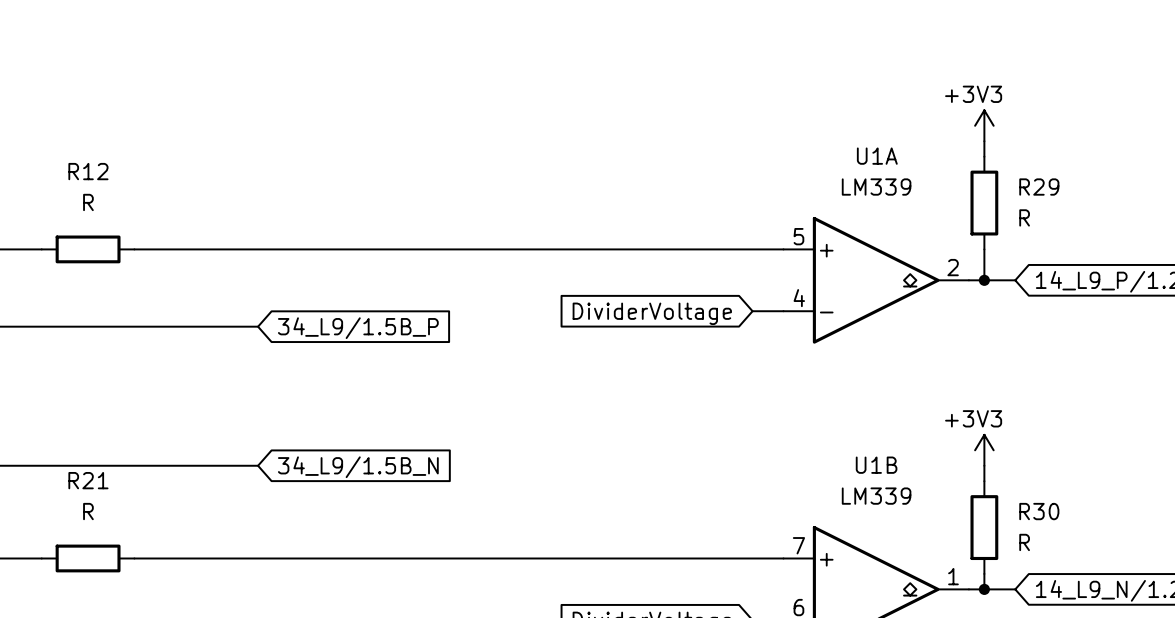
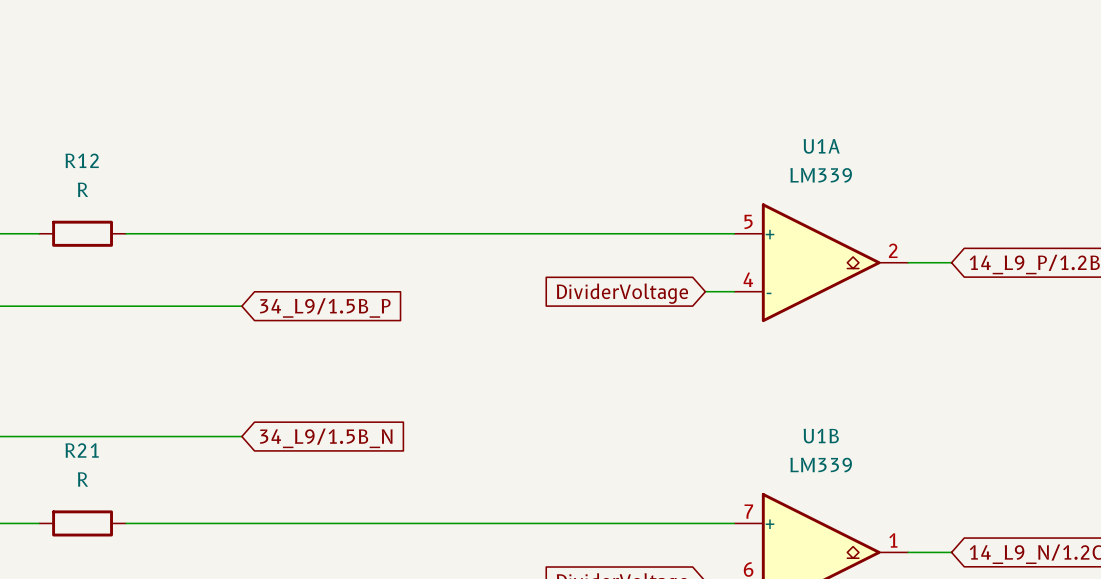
power symbol: +3V3 (984, 125) -> none
wire: (984, 141) (984, 156) -> none
R29: R (984, 203) -> none
wire: (984, 249) (984, 280) -> none
junction: (984, 280) -> none
power symbol: +3V3 (984, 450) -> none
wire: (984, 465) (984, 481) -> none
R30: R (984, 527) -> none
wire: (984, 573) (984, 589) -> none
junction: (984, 589) -> none

